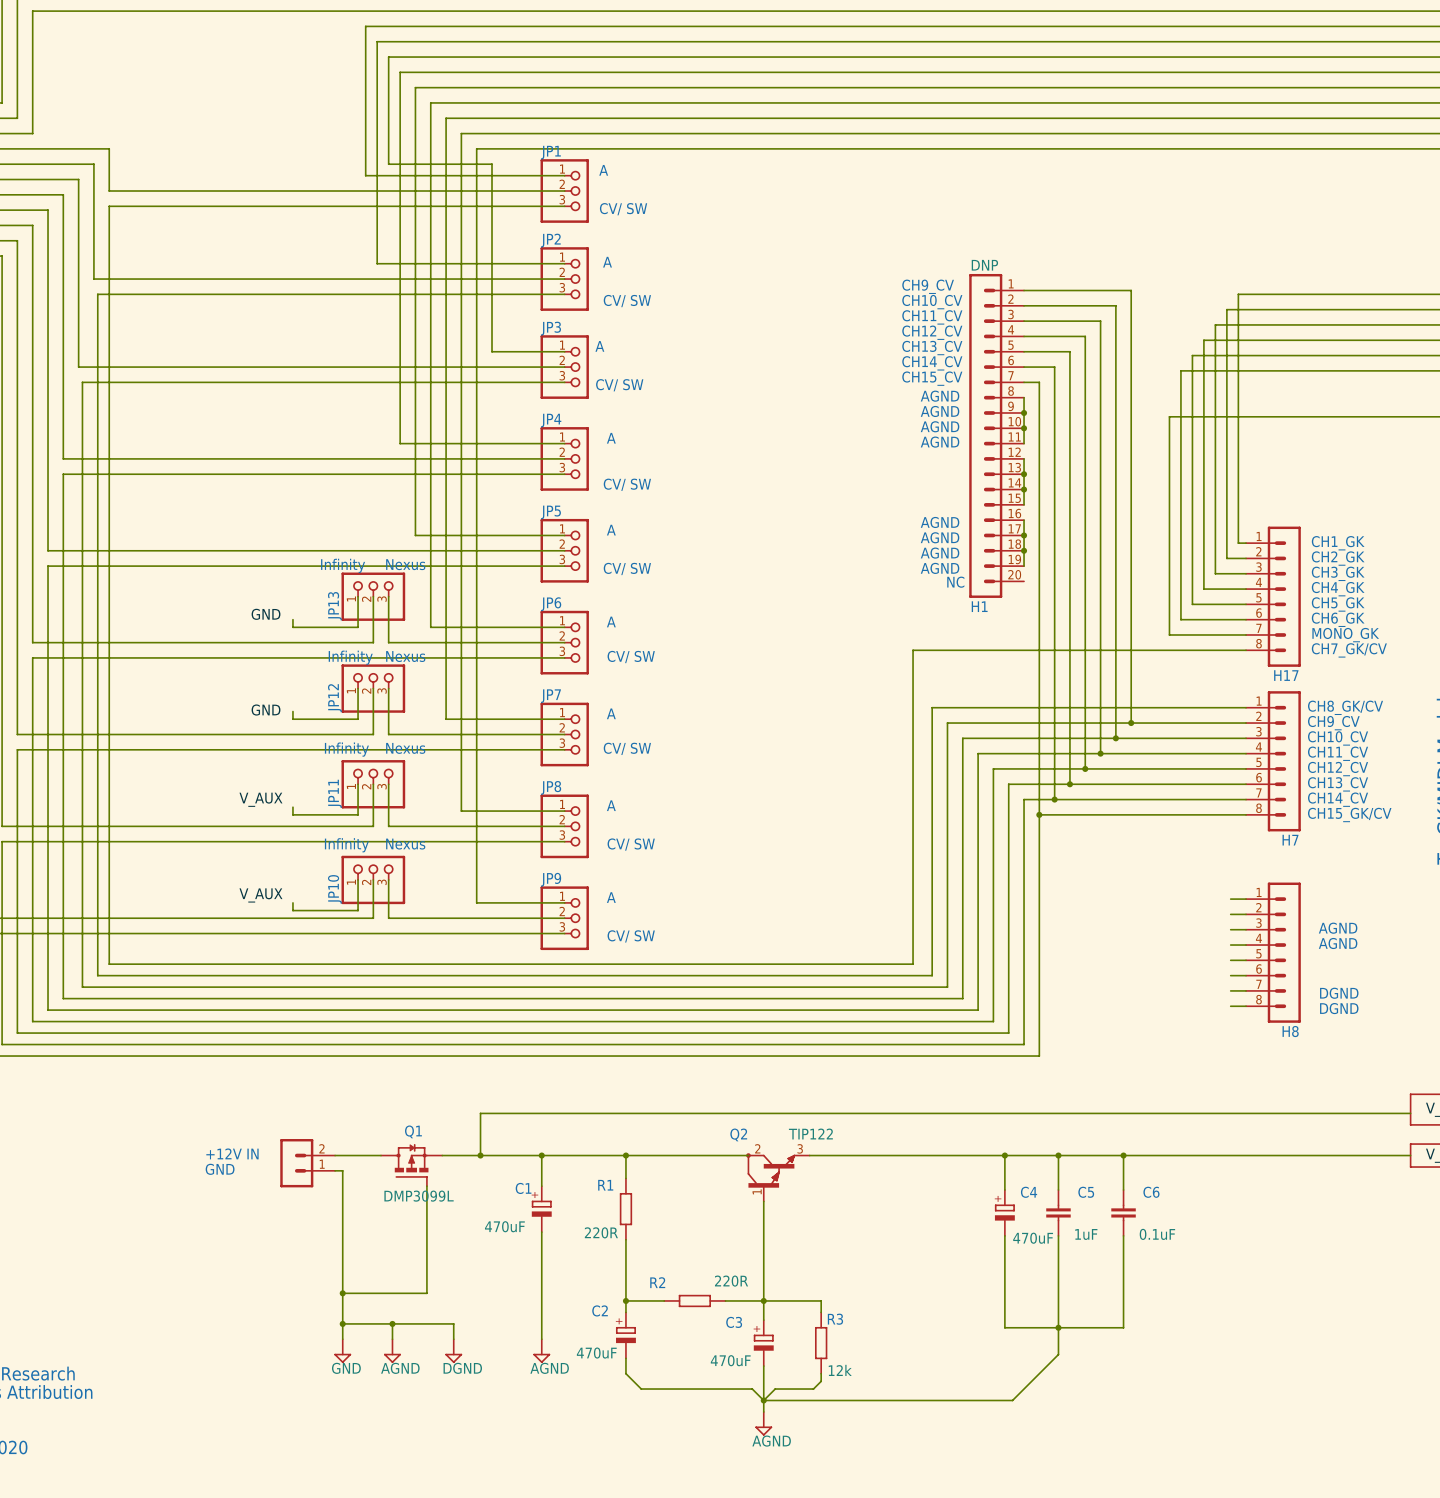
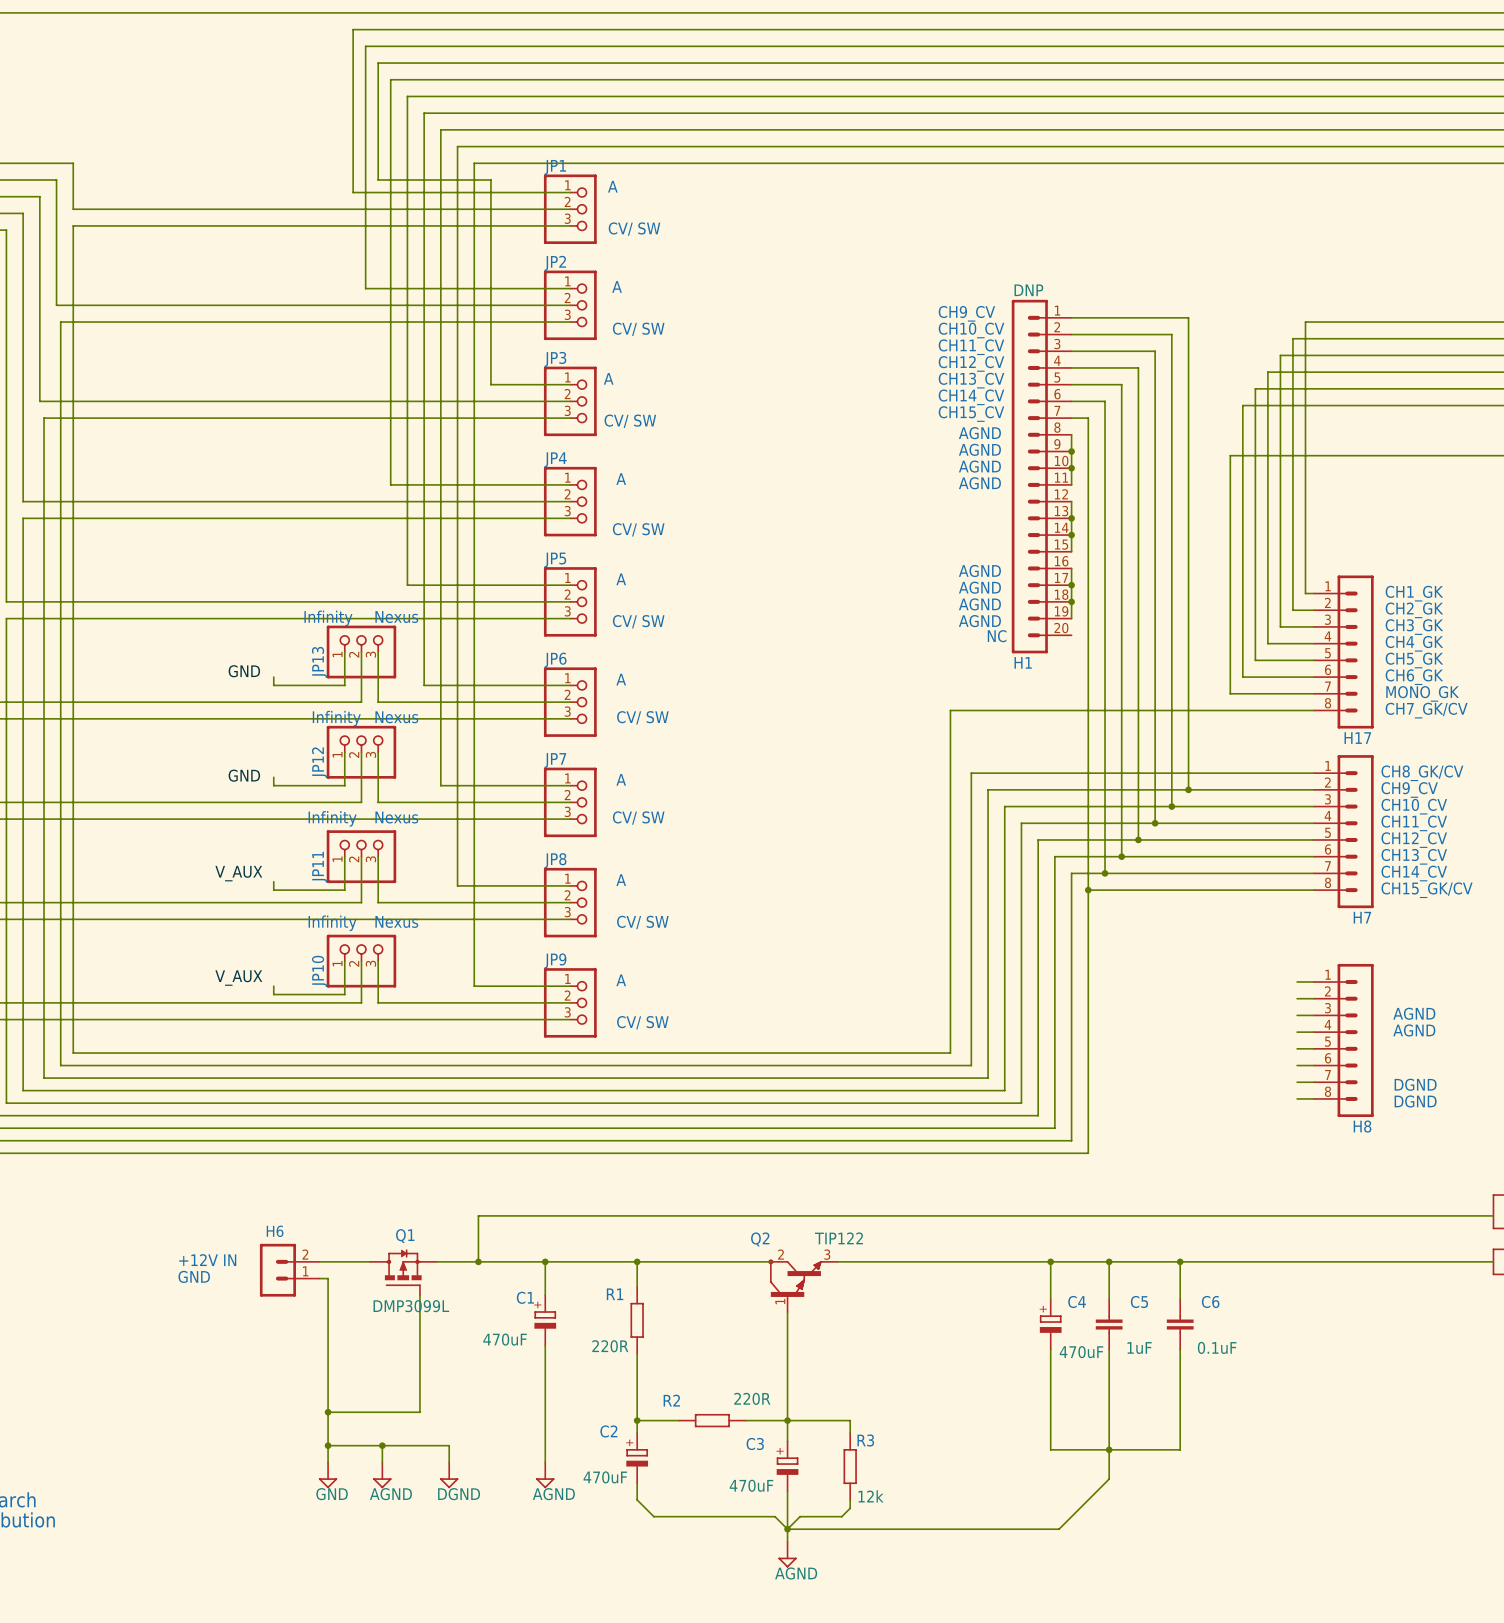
text: none -> H6 (275, 1231)

